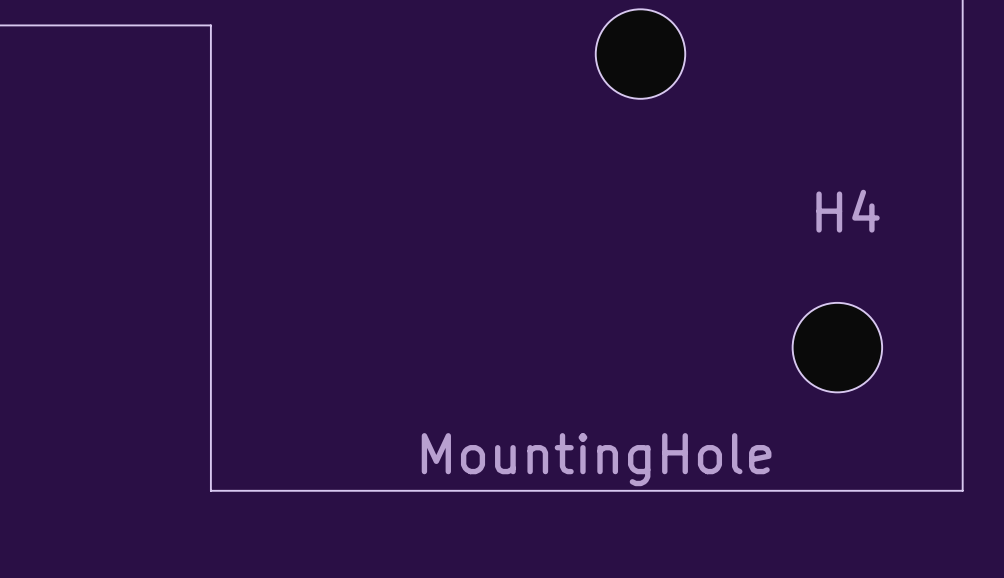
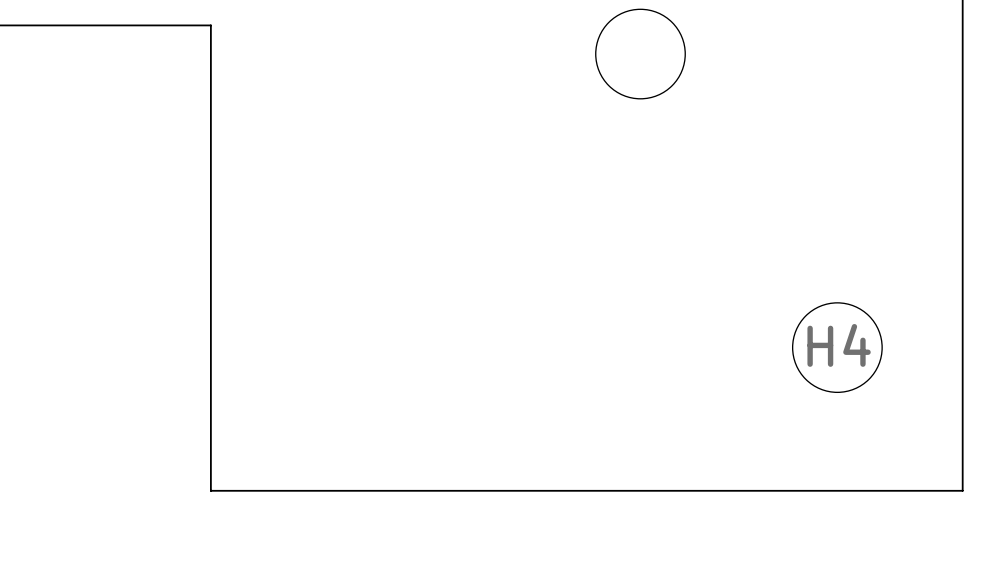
H4 name position: H4 (848, 211) -> H4 (839, 345)
H4 value: MountingHole (596, 459) -> none

